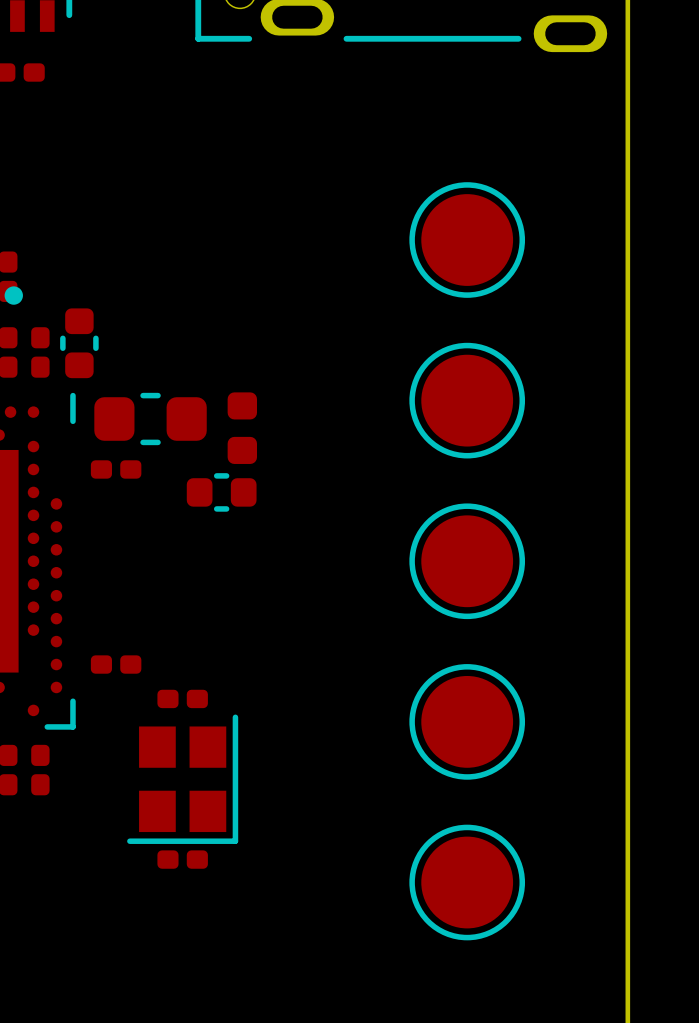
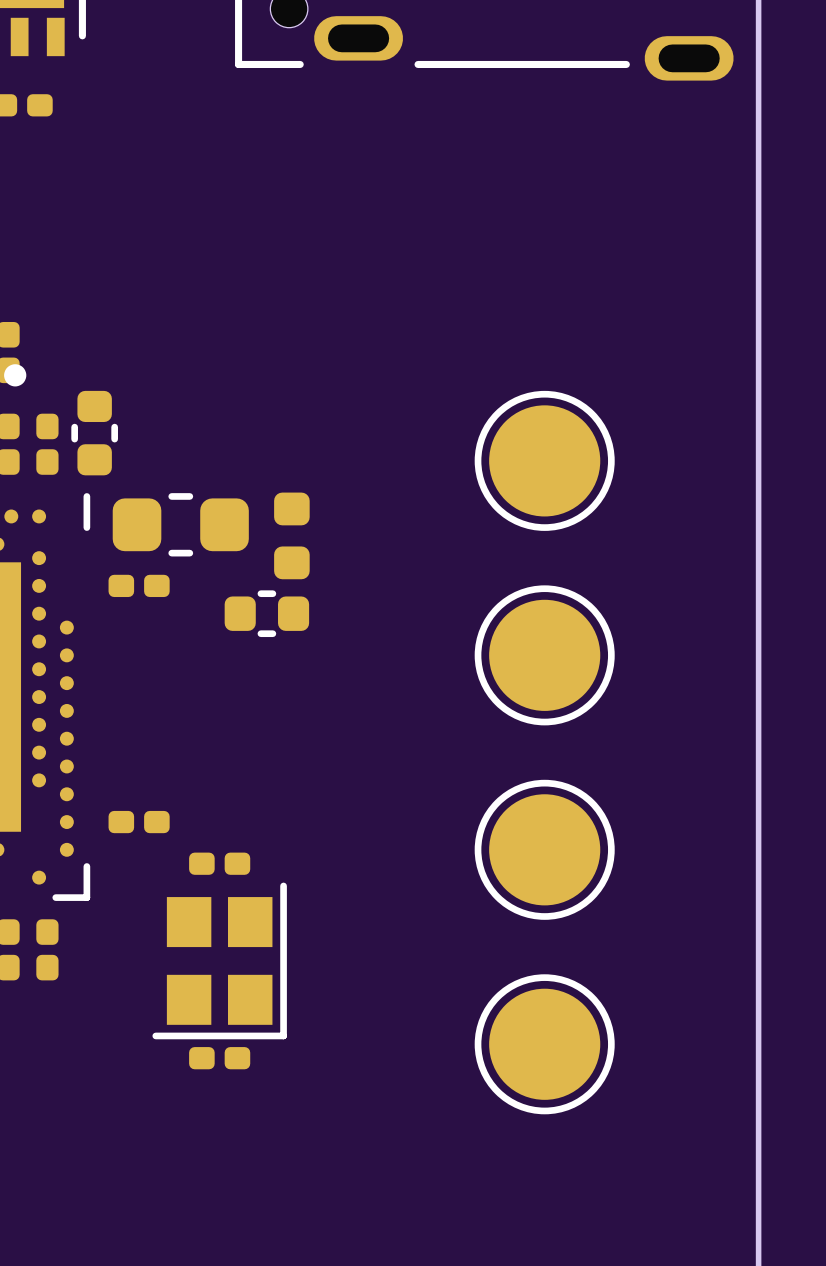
part: (467, 240) -> none
part position: (467, 400) -> (544, 460)
part position: (467, 561) -> (544, 655)
part position: (467, 721) -> (544, 849)
part position: (467, 882) -> (544, 1044)

